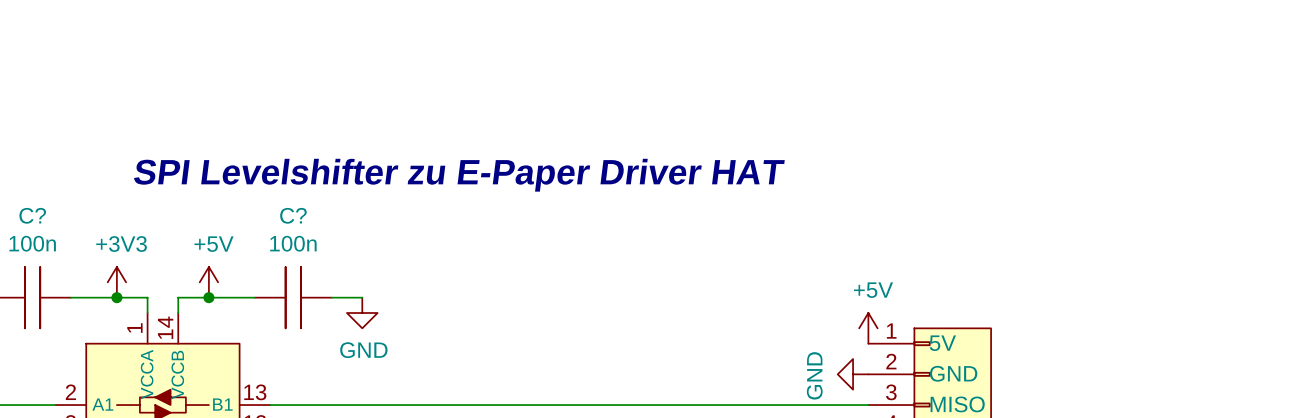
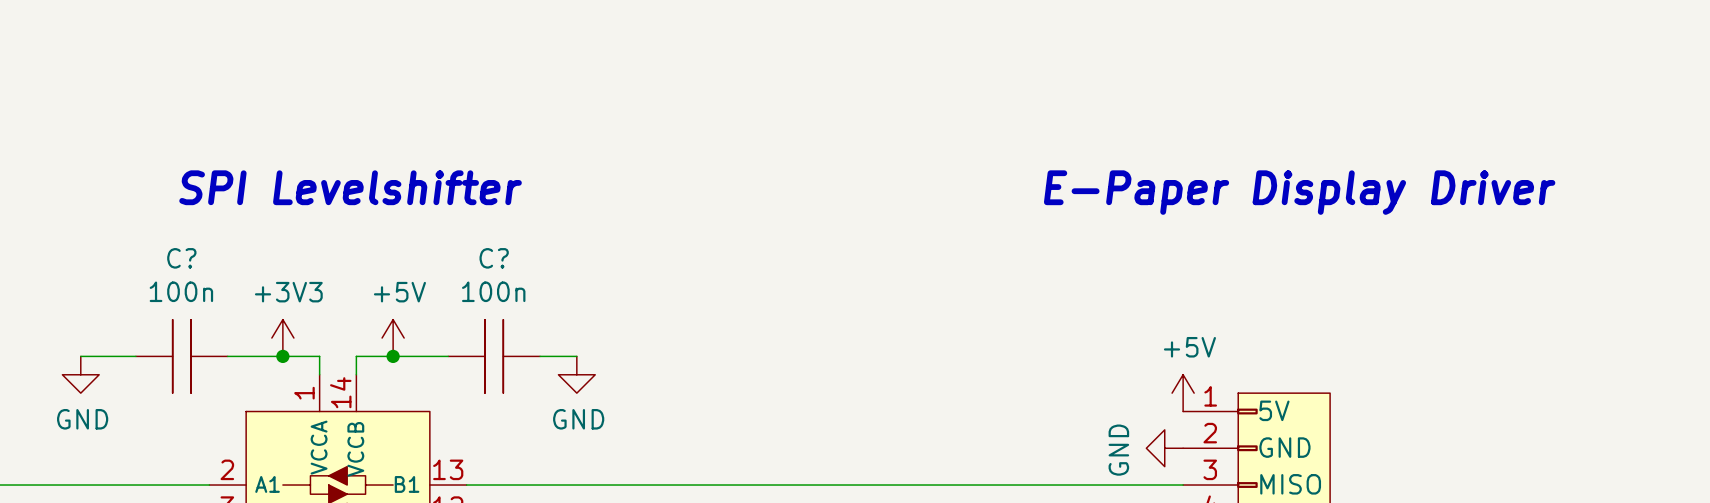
text: none -> SPI Levelshifter (350, 187)
text: none -> E-Paper Display Driver (1299, 192)
text: SPI Levelshifter zu E-Paper Driver HAT (459, 175) -> none

